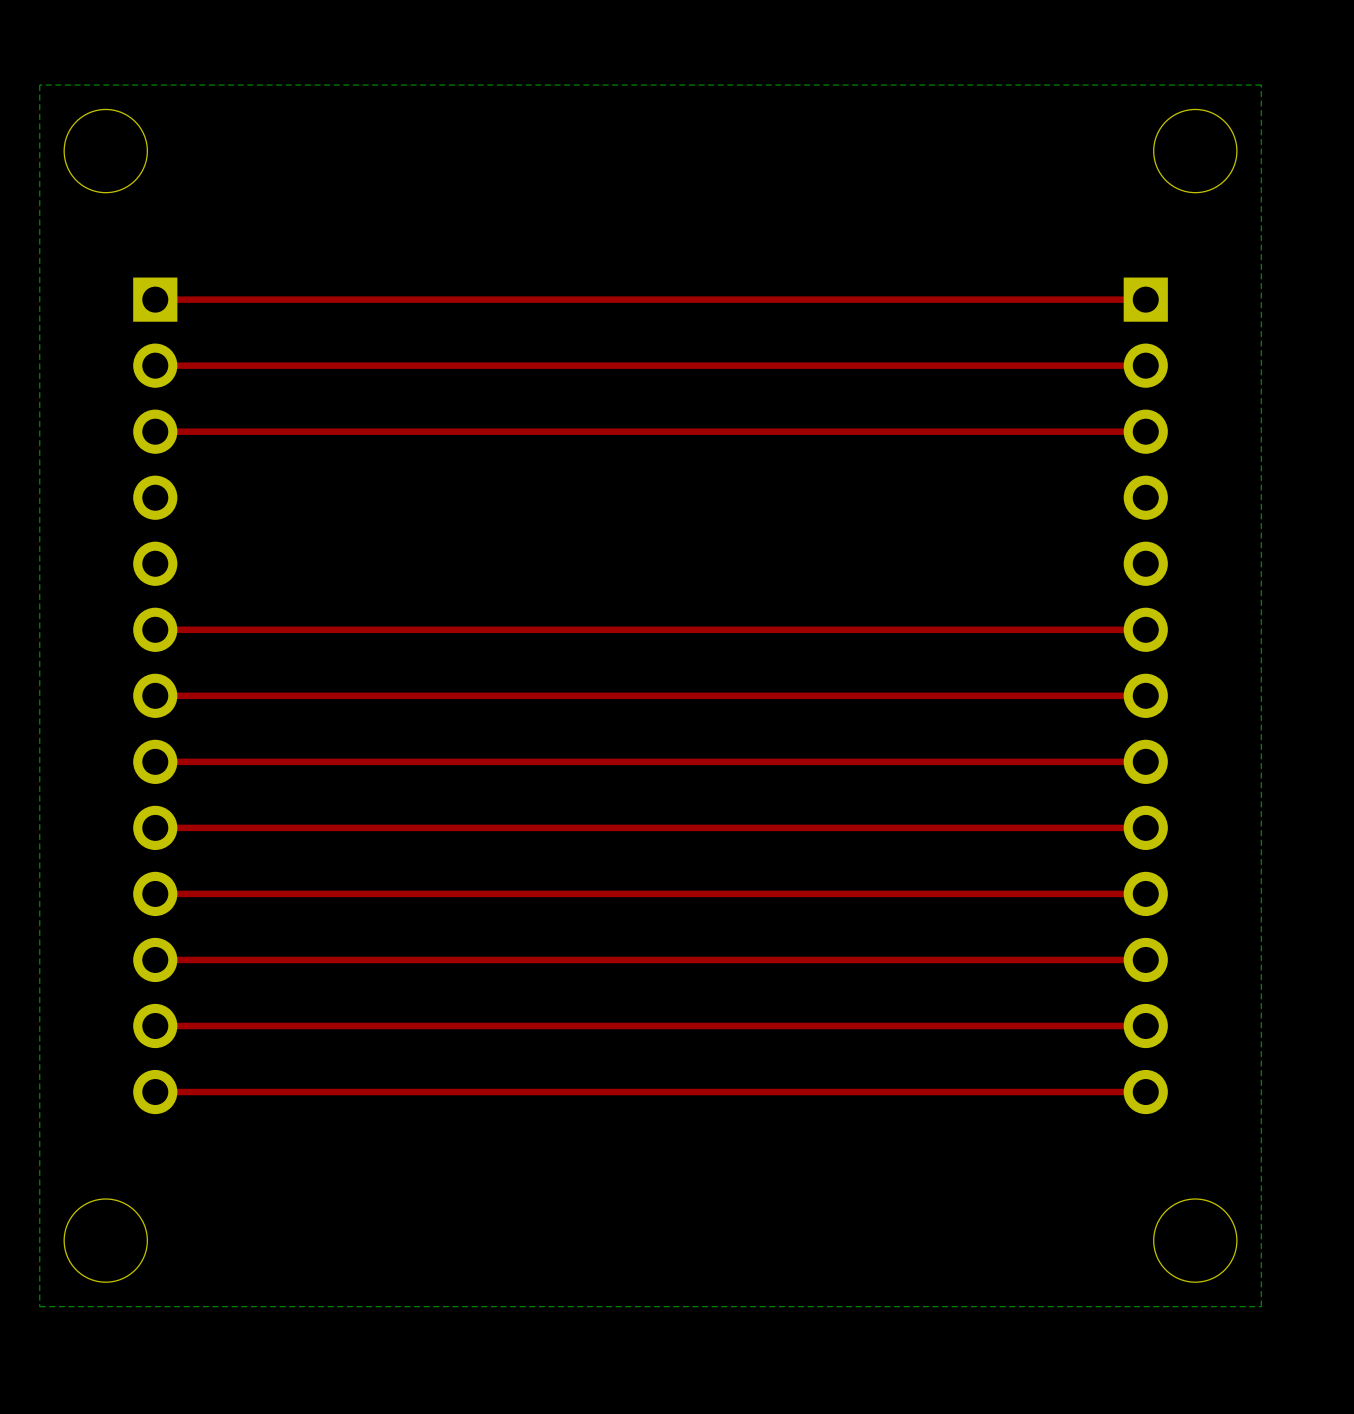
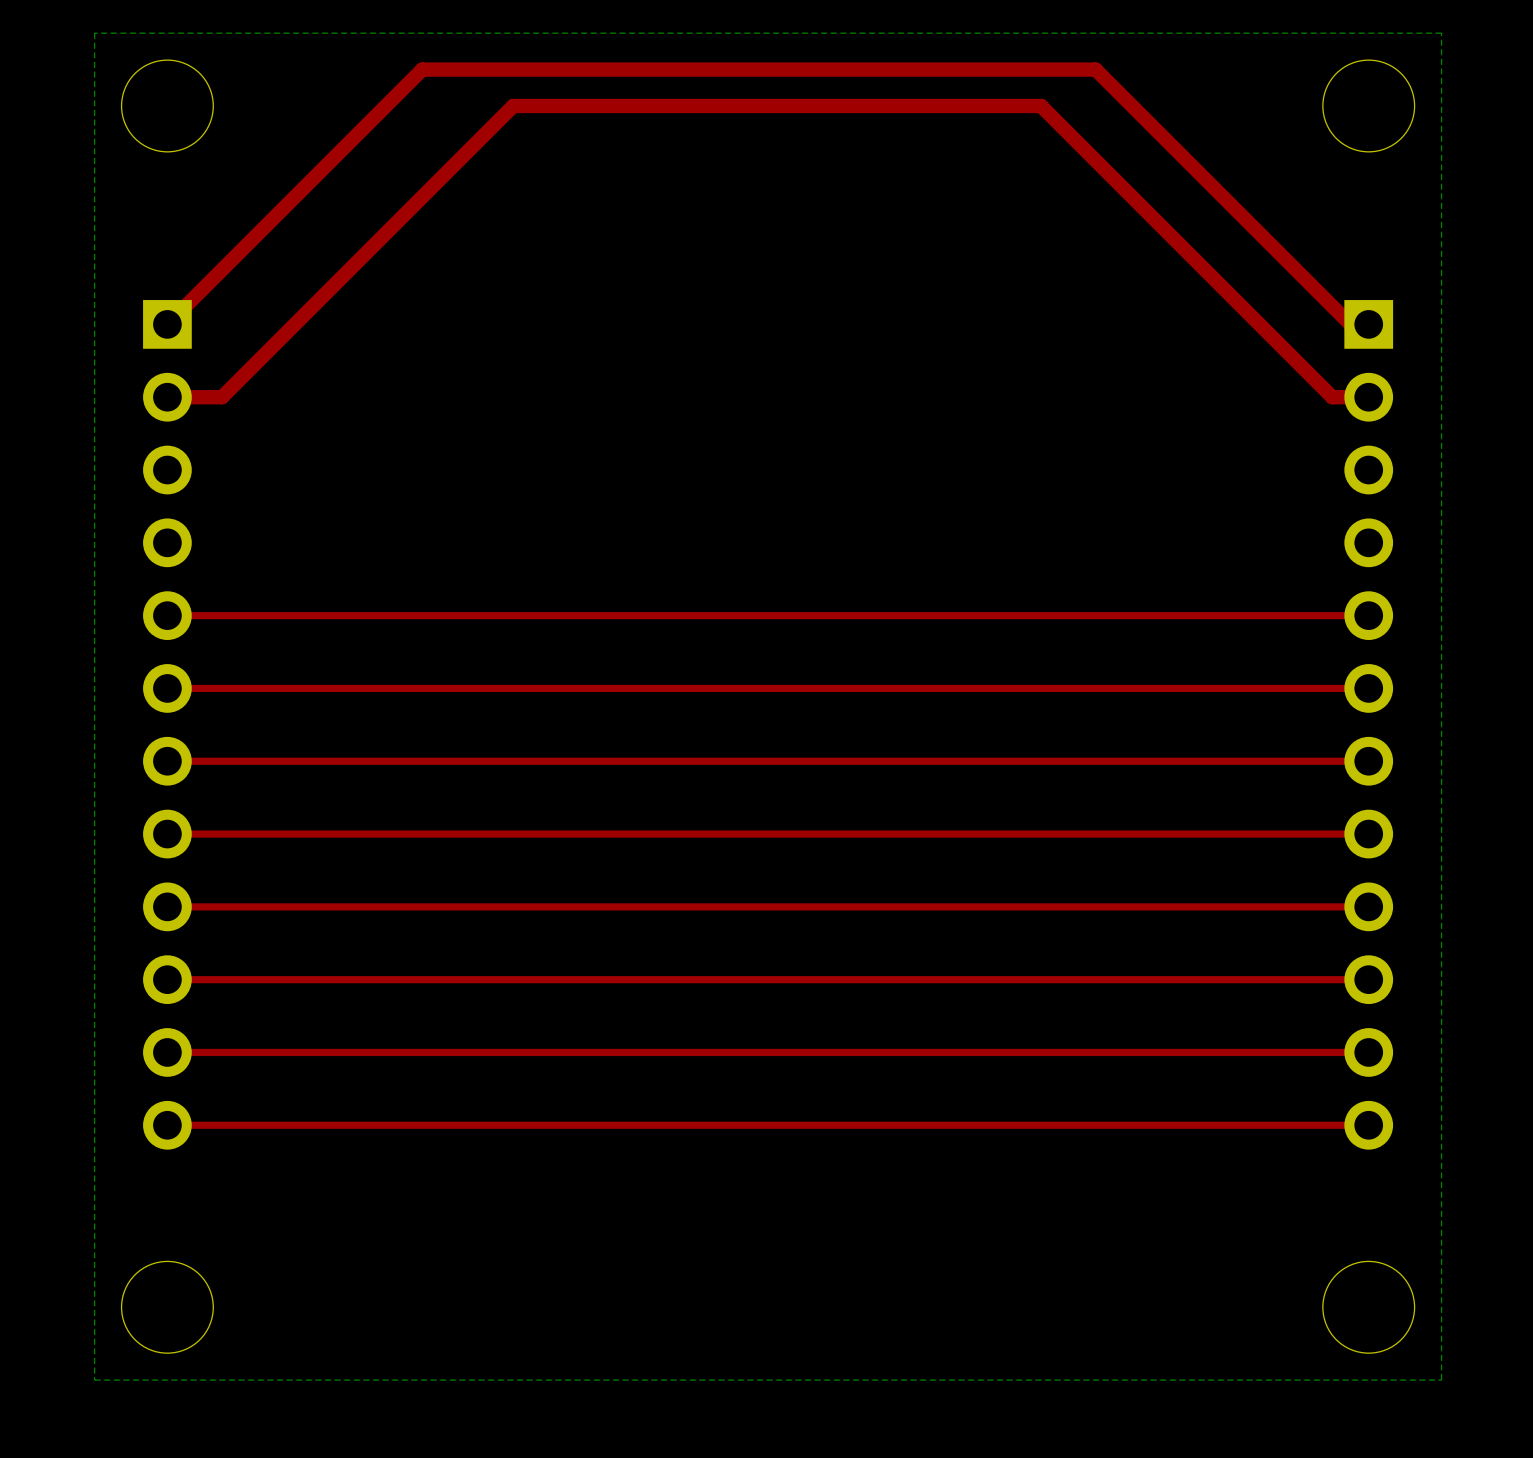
top track: (1145, 299) (155, 299) -> none
top track: none -> (1368, 324) (1350, 324) (1095, 69) (422, 69) (167, 324)
top track: (1145, 365) (155, 365) -> none
top track: none -> (1368, 397) (1332, 397) (1041, 105) (513, 105) (222, 397) (167, 397)
top track: (1145, 431) (155, 431) -> none
top track: none -> (1368, 615) (167, 615)
top track: (1145, 629) (155, 629) -> none
top track: none -> (1368, 688) (167, 688)
part: (155, 695) -> none
top track: (1145, 695) (155, 695) -> none
part: (1145, 695) -> none
part: none -> (167, 724)
part: none -> (1368, 724)
top track: none -> (1368, 761) (167, 761)
top track: (1145, 761) (155, 761) -> none
top track: none -> (1368, 834) (167, 834)
top track: (1145, 827) (155, 827) -> none
top track: none -> (1368, 906) (167, 906)
top track: (1145, 893) (155, 893) -> none
top track: none -> (1368, 979) (167, 979)
top track: (1145, 959) (155, 959) -> none
top track: none -> (1368, 1052) (167, 1052)
top track: (1145, 1025) (155, 1025) -> none
top track: none -> (1368, 1125) (167, 1125)
top track: (1145, 1092) (155, 1092) -> none

